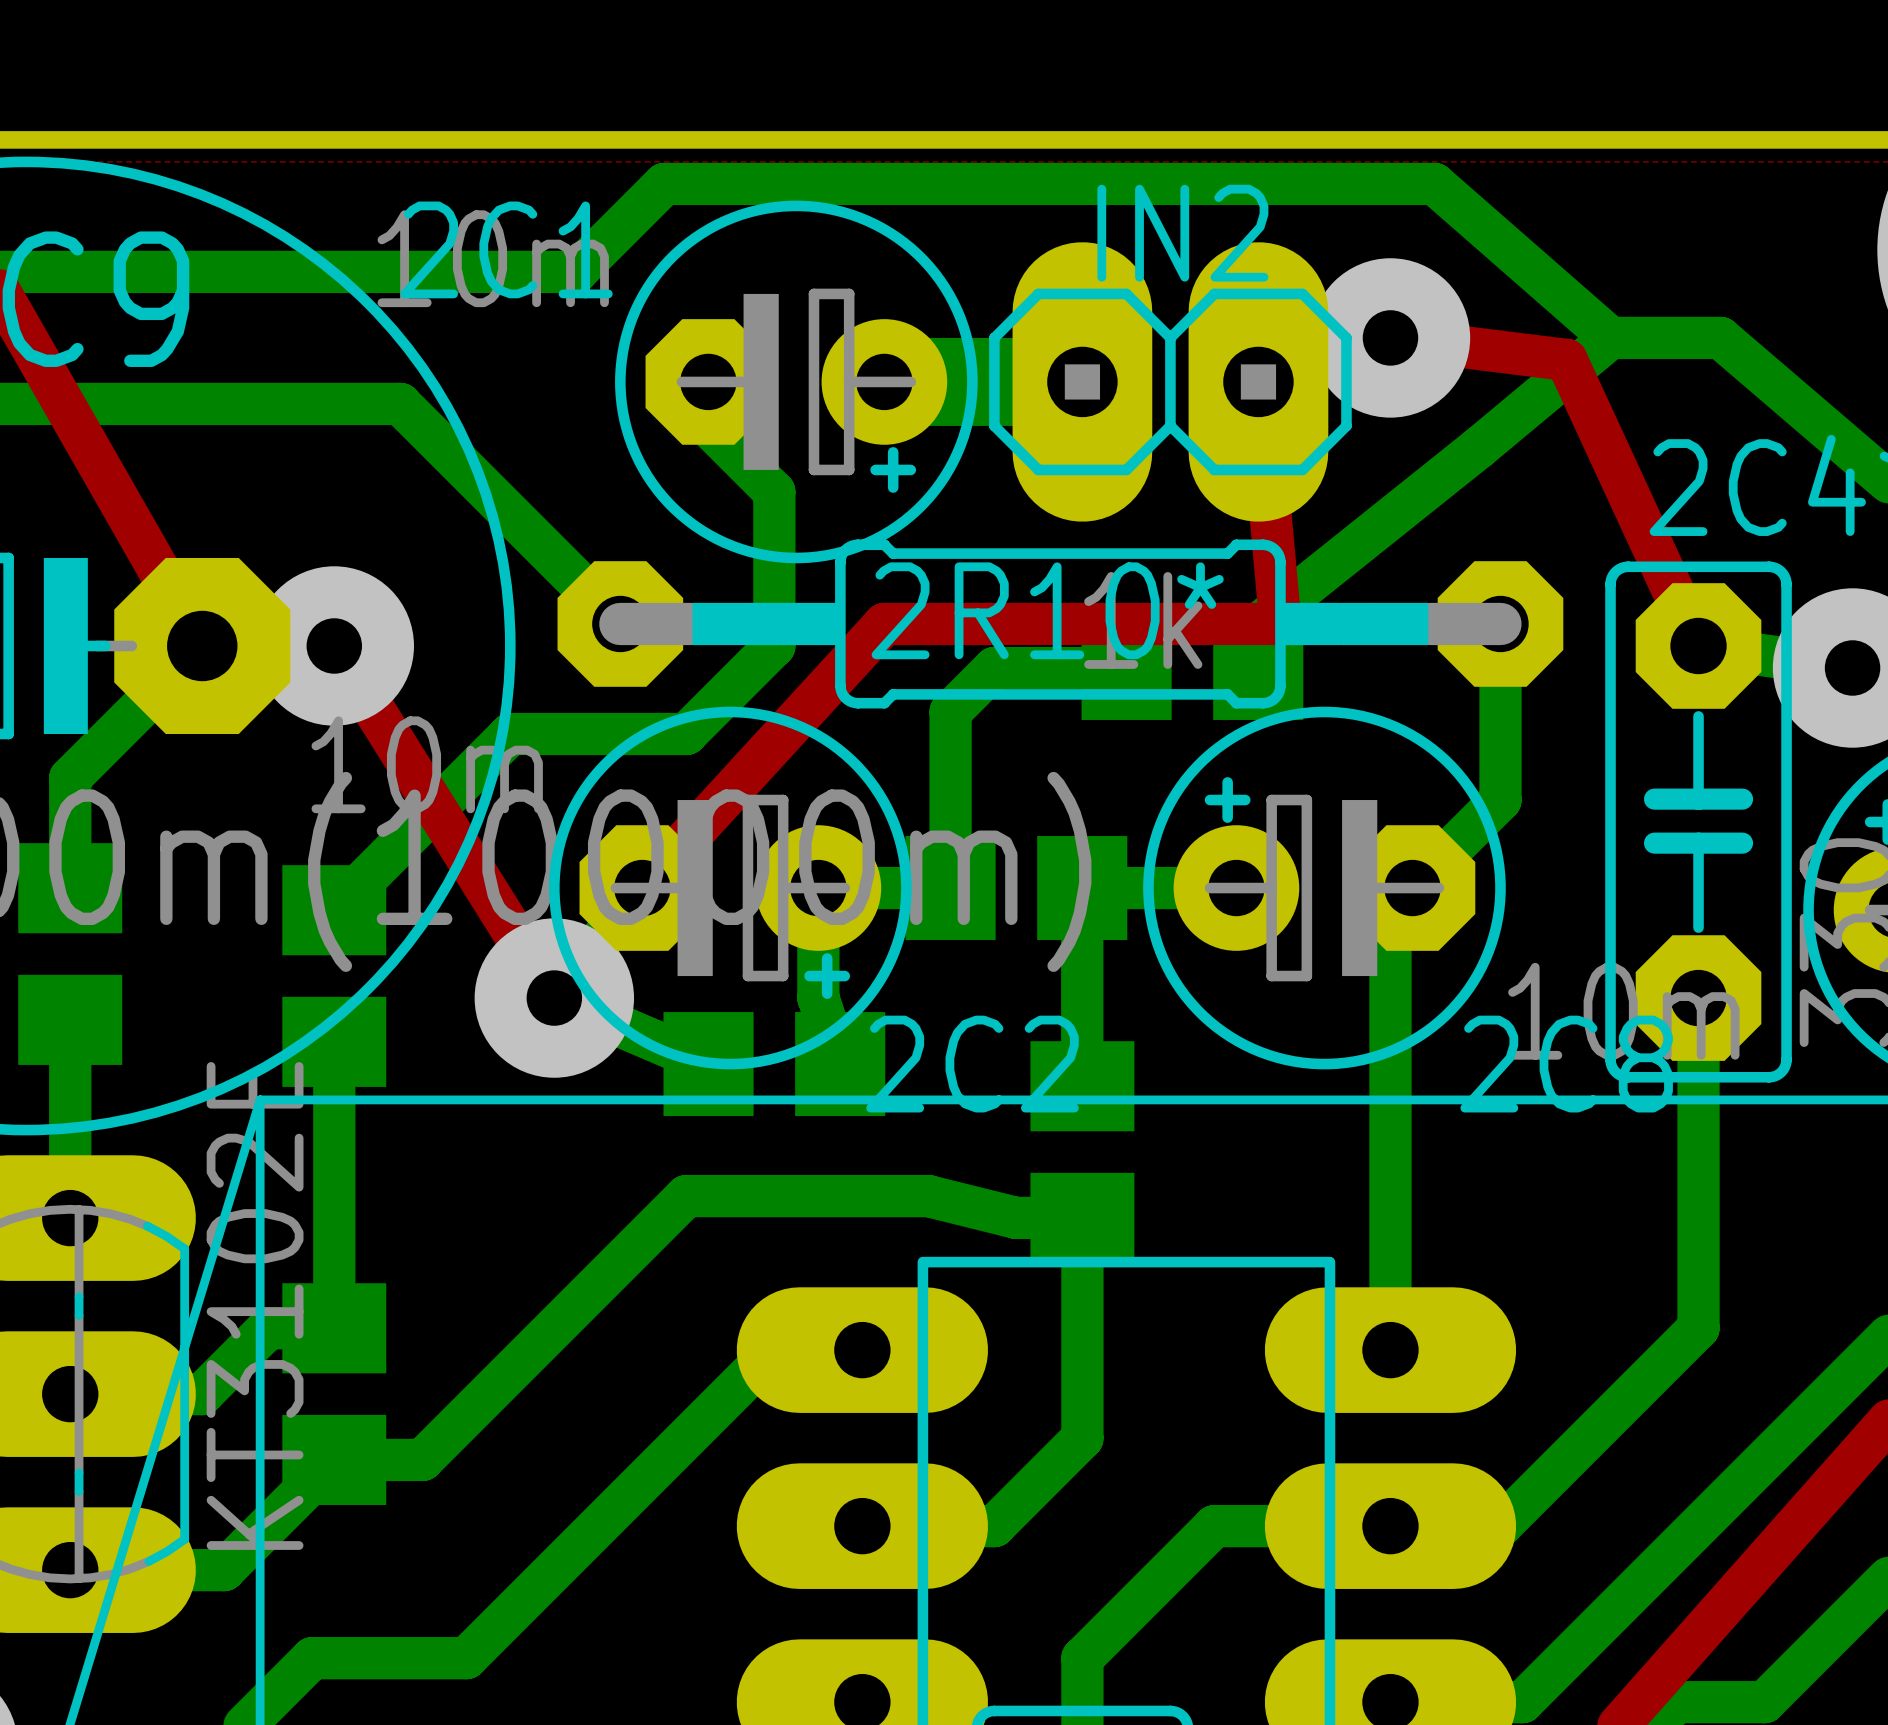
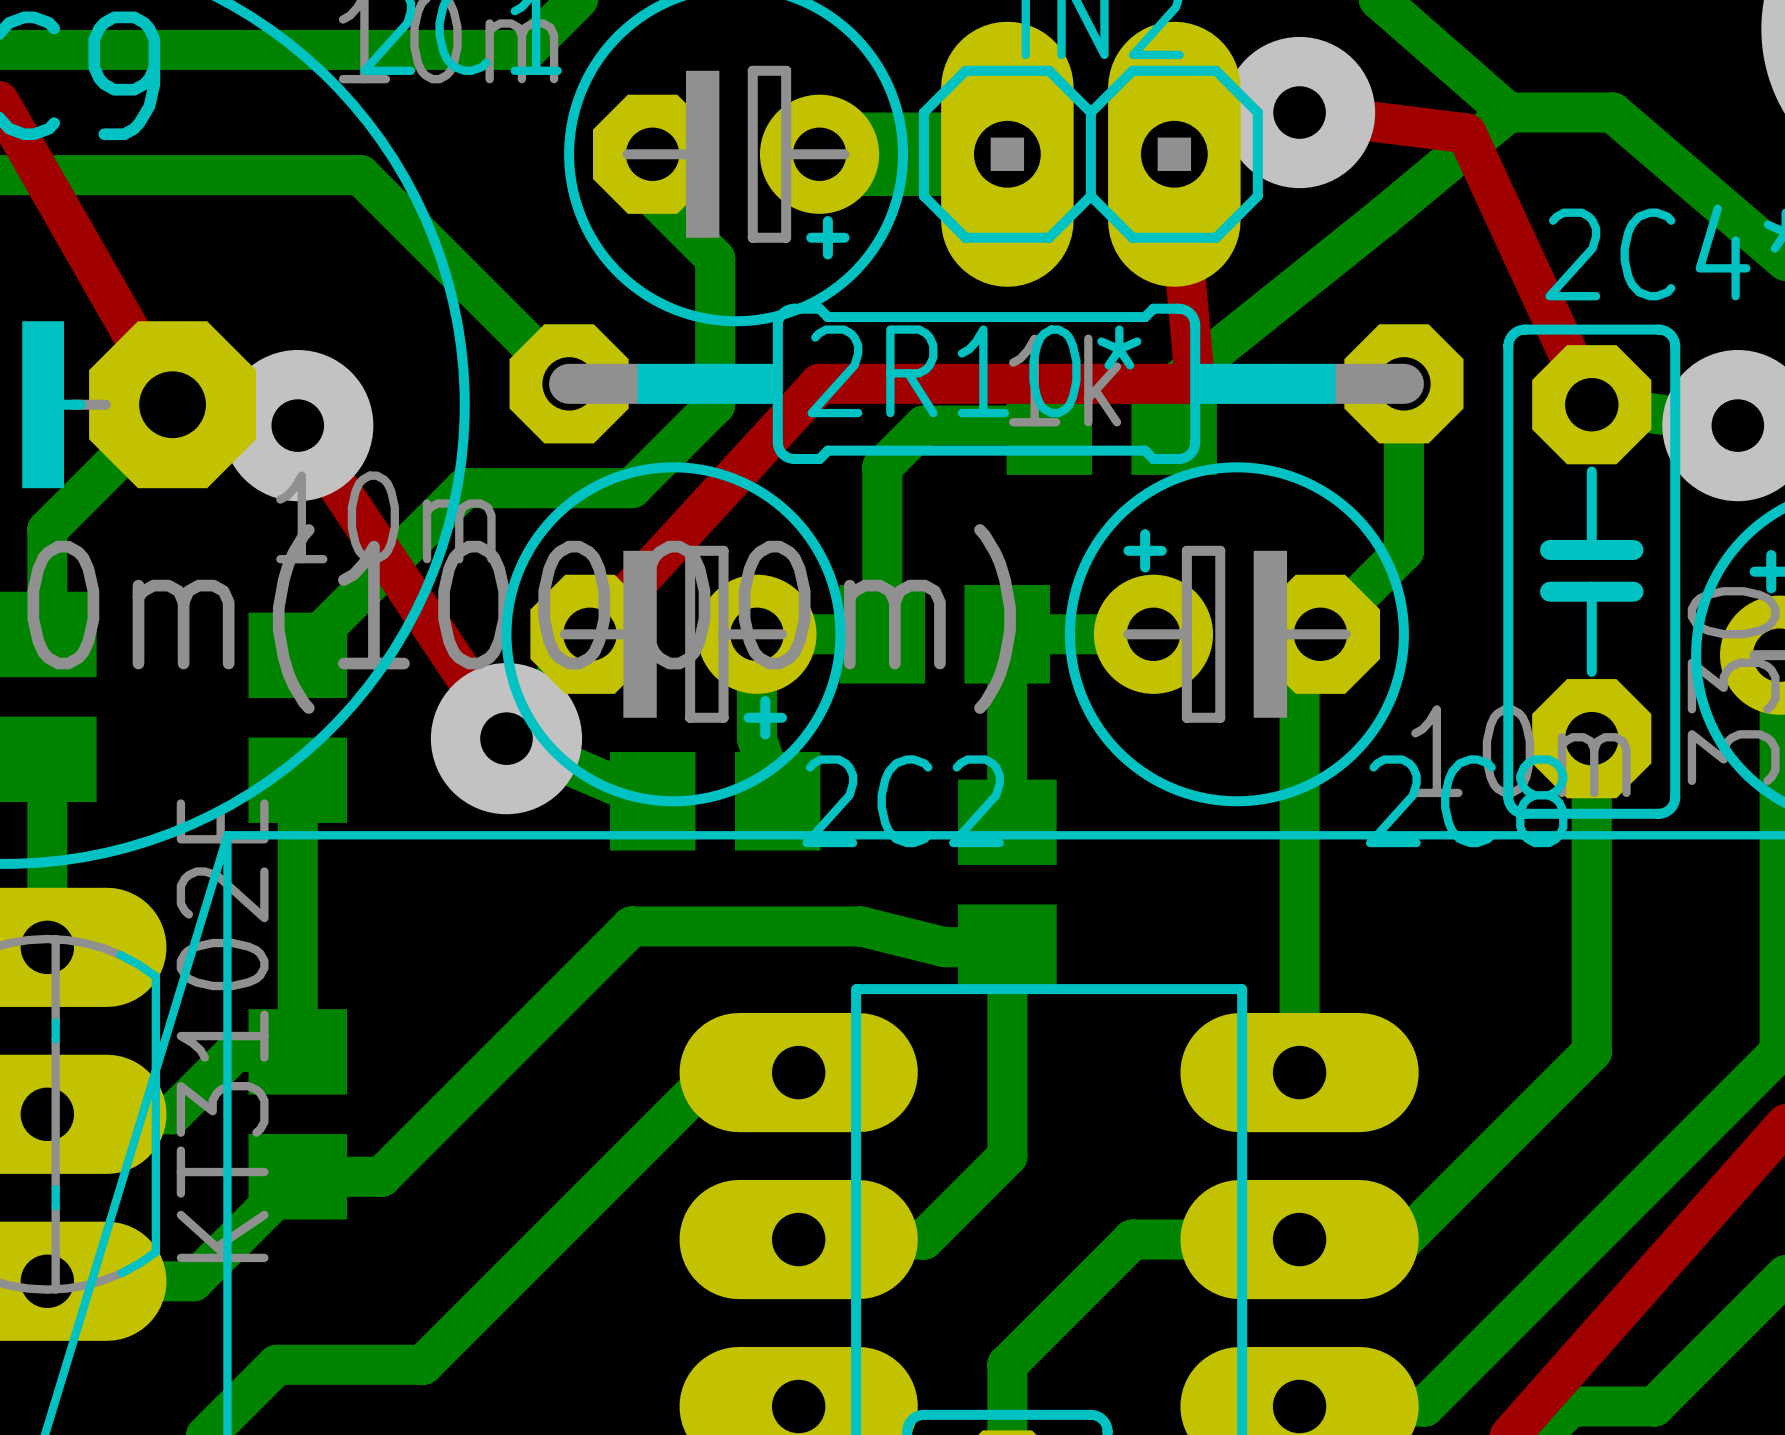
top track: (334, 645) (554, 998) -> (297, 425) (506, 738)
via position: (334, 645) -> (297, 425)

